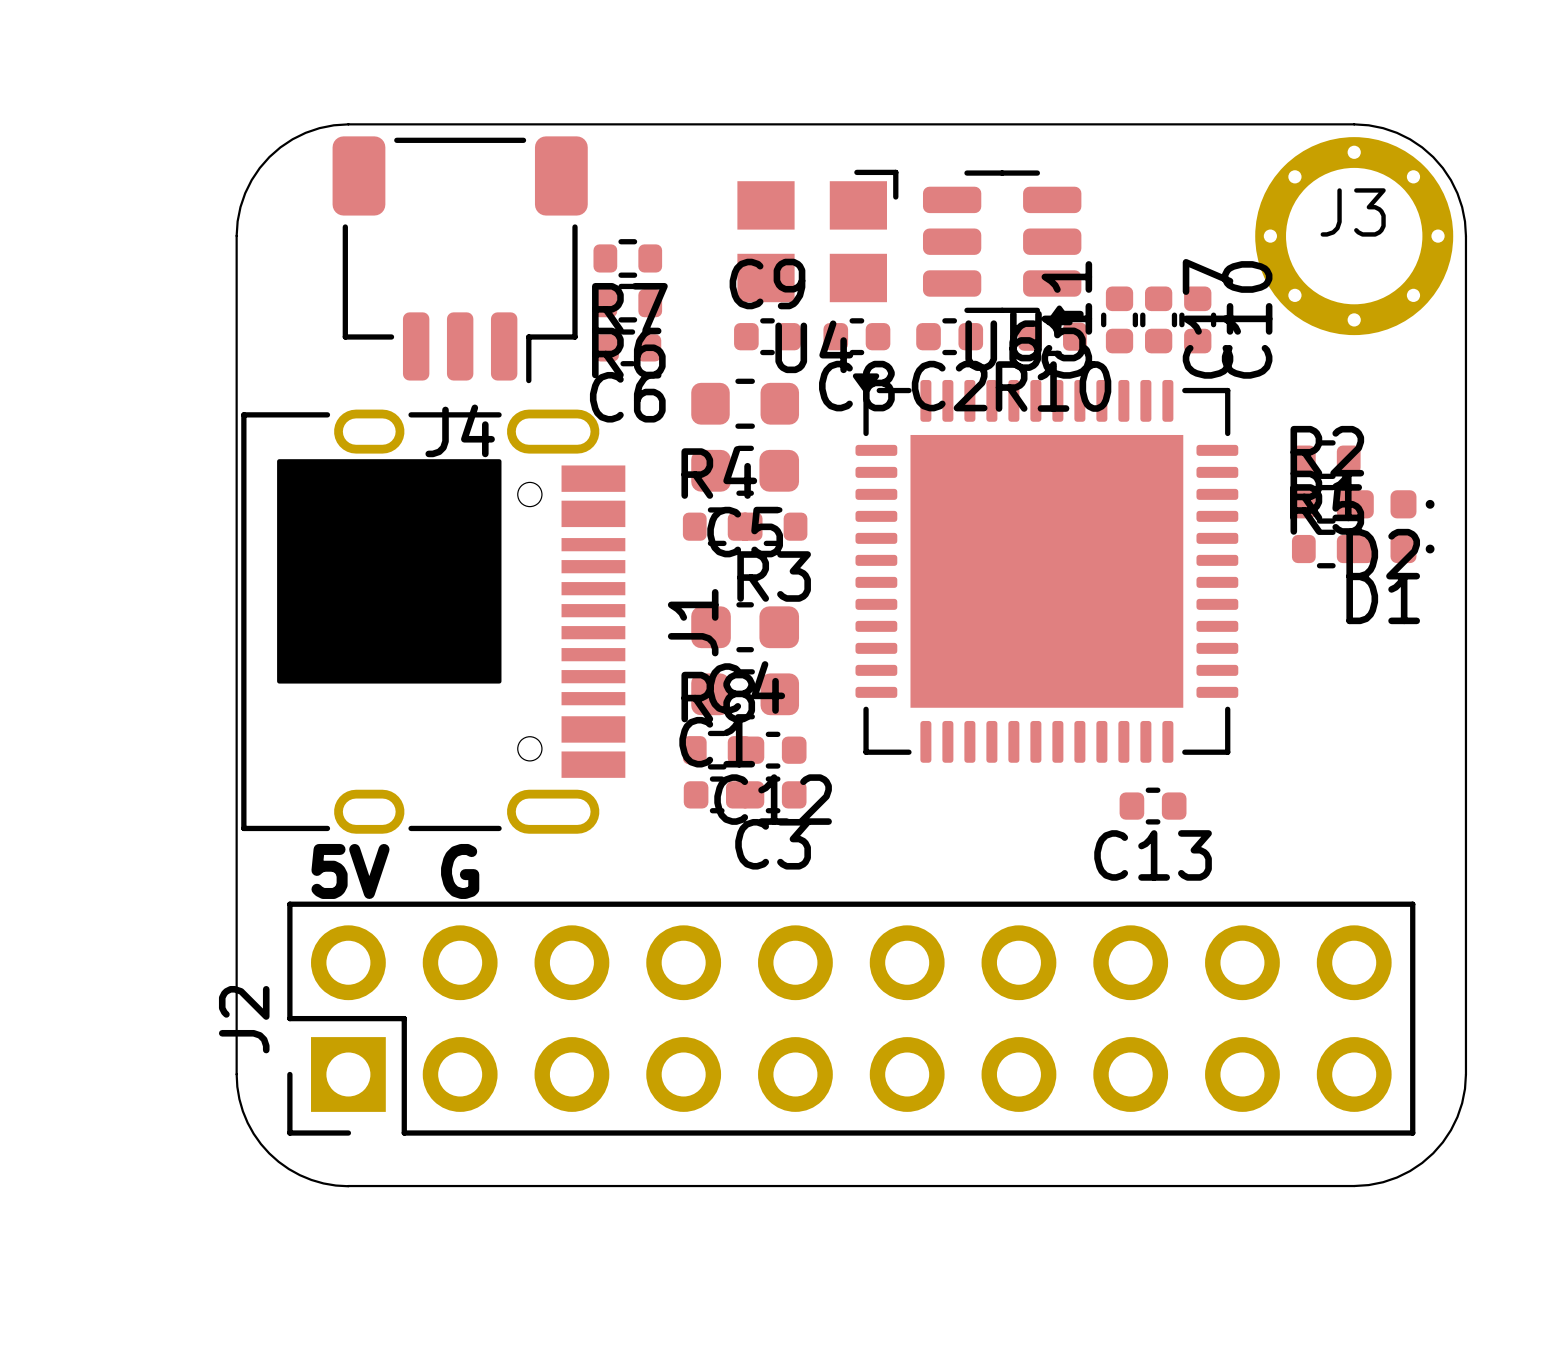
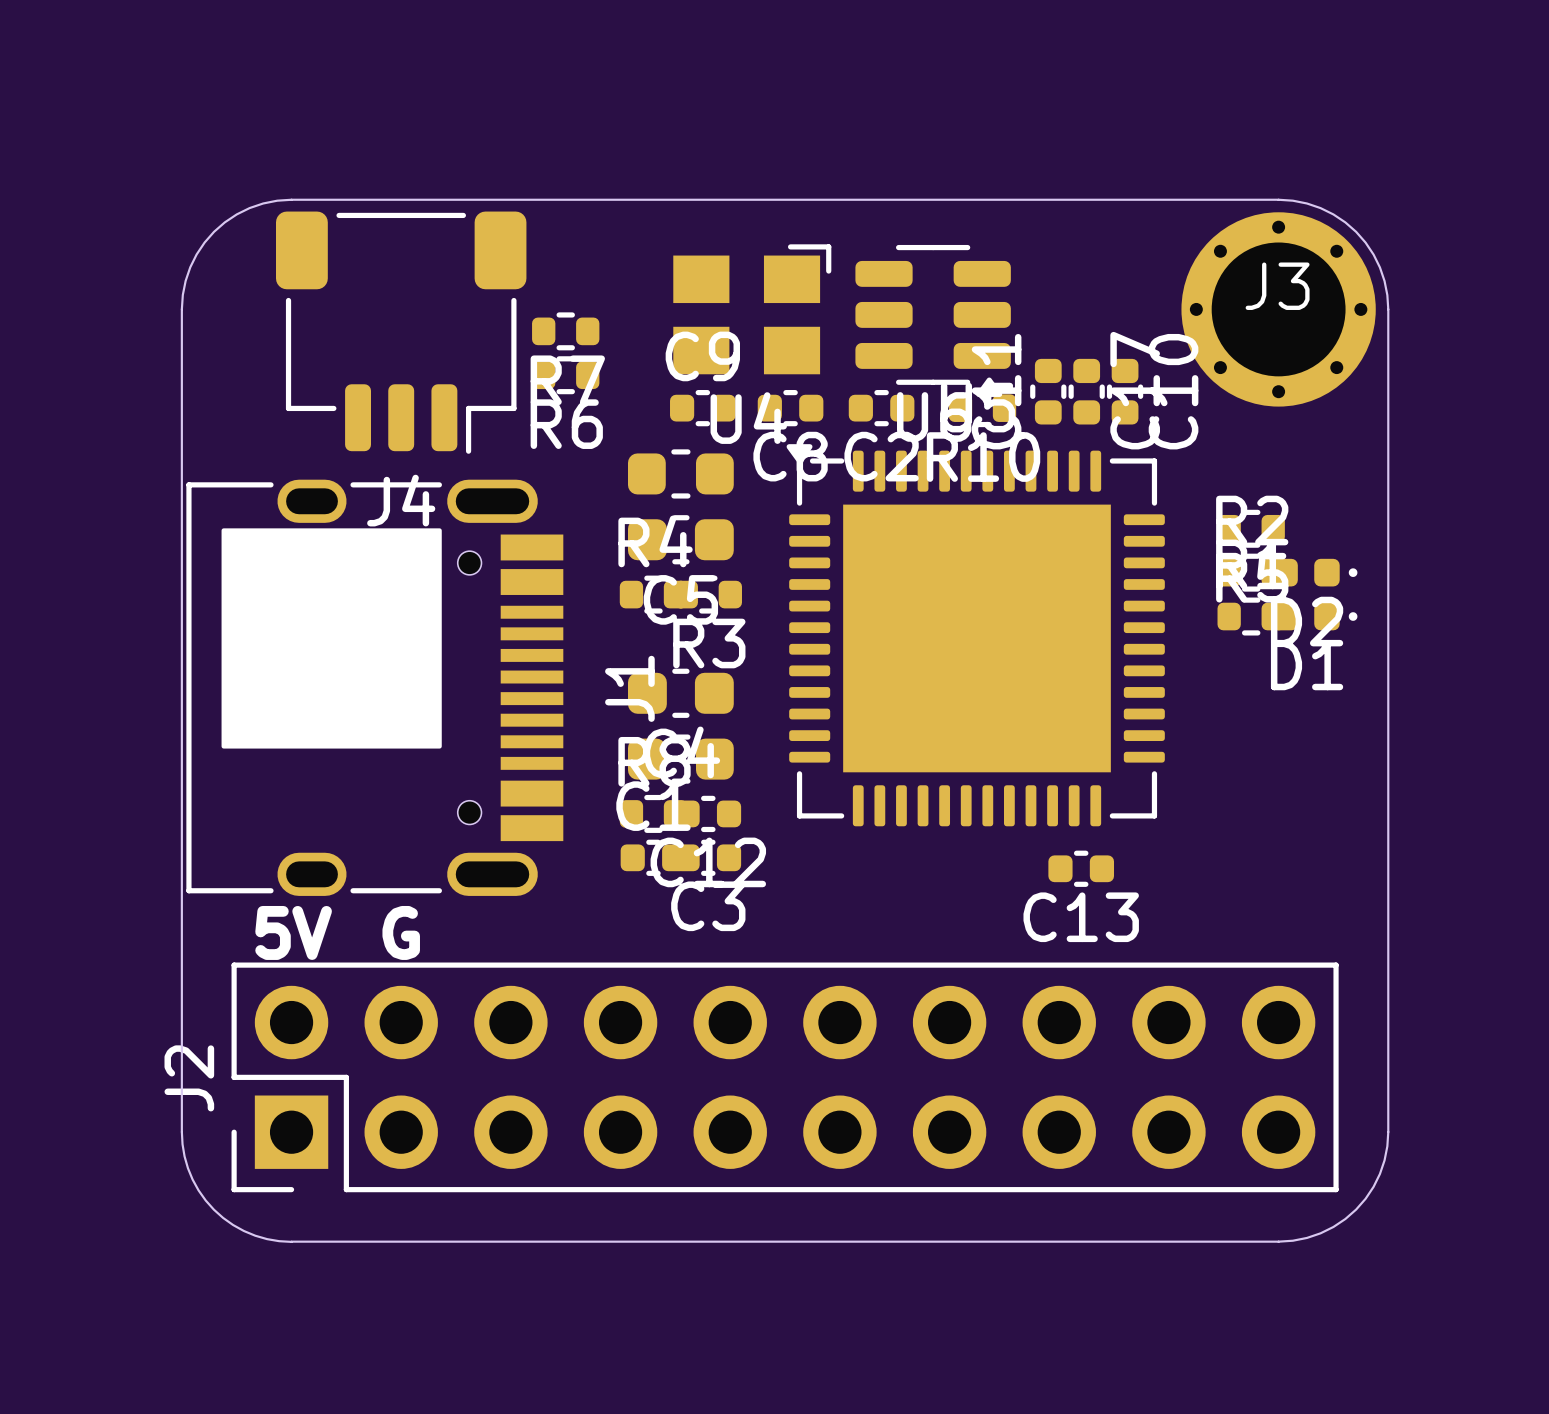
C6: (627, 347) -> none

